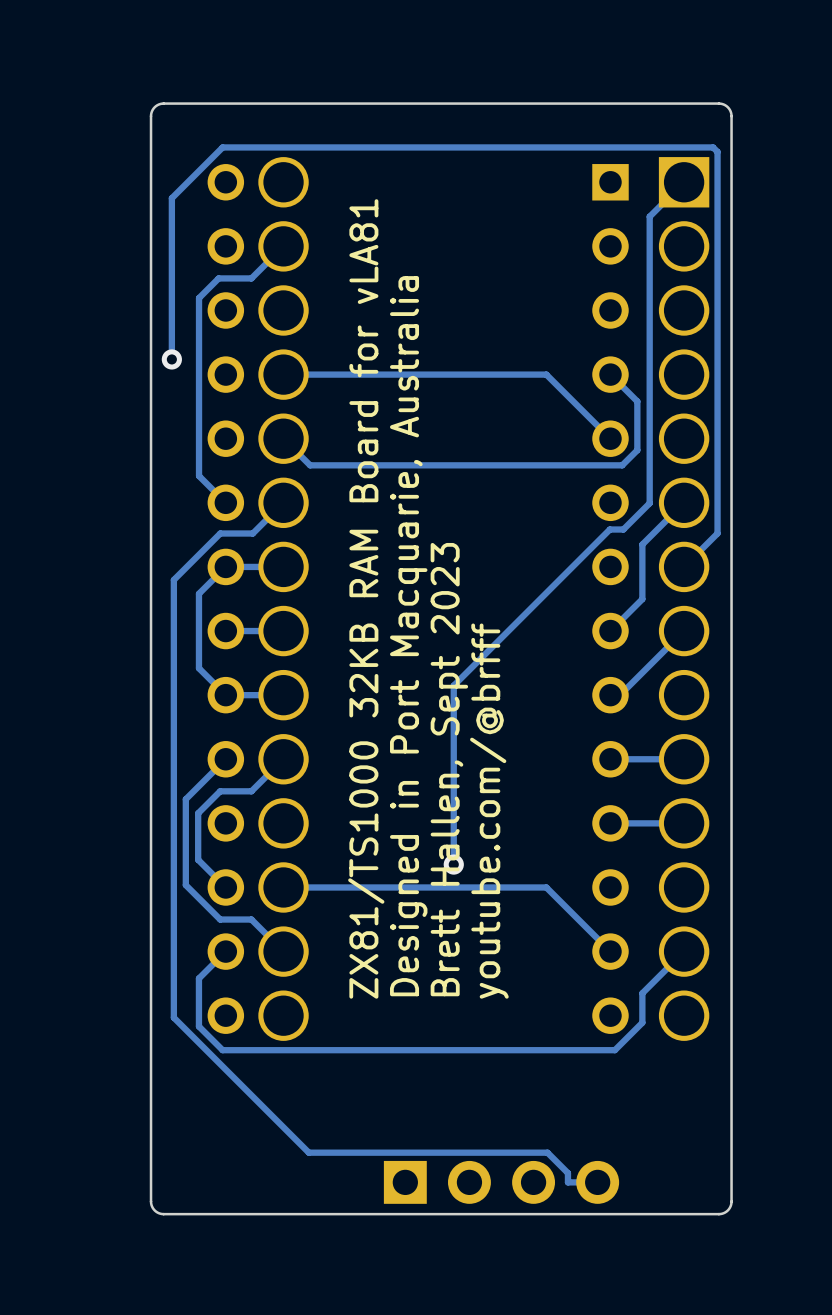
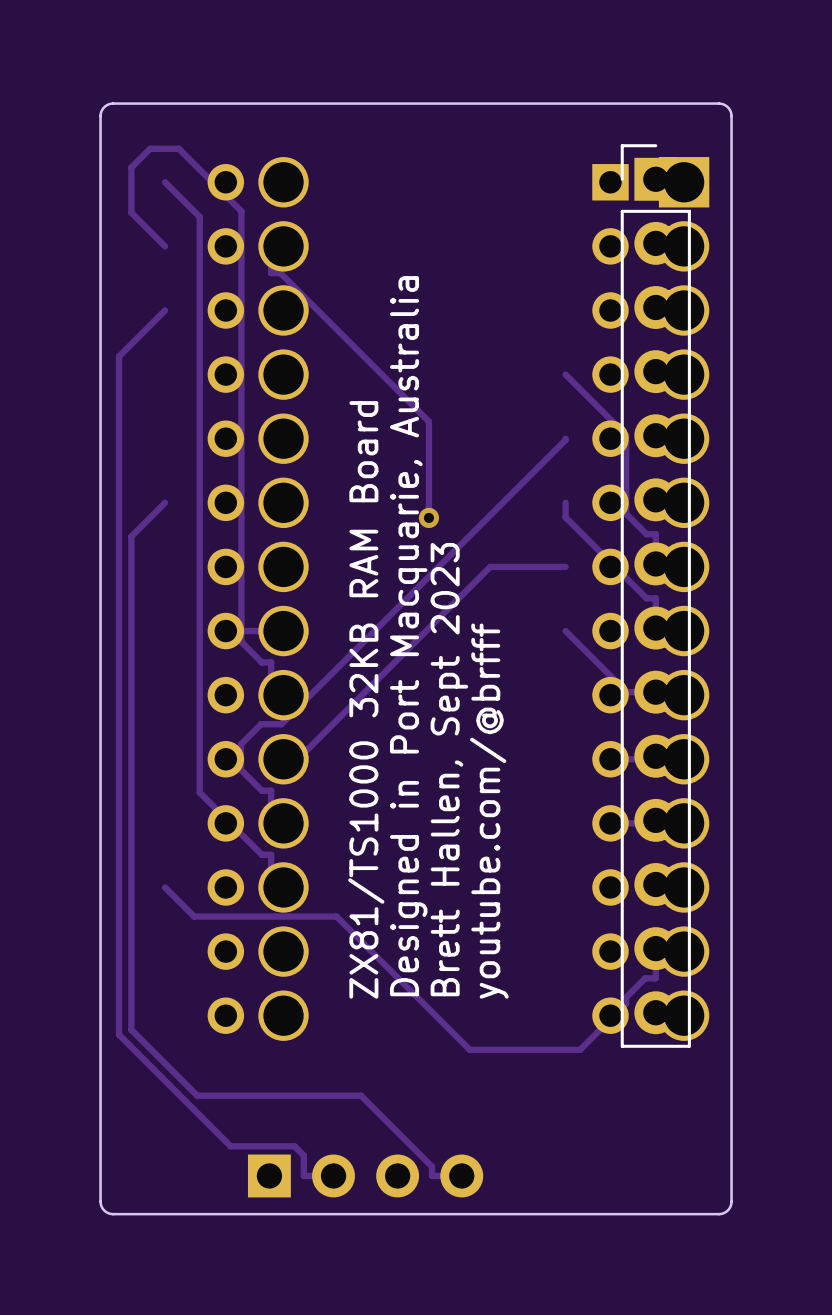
board edge: (163, 103) (154, 107) (151, 116) (151, 1201) (154, 1210) (163, 1214) -> (163, 103) (109, 104) (103, 108) (100, 116) (100, 1201) (103, 1209) (109, 1213) (163, 1214)
track: none -> (165, 182) (199, 216) (199, 792) (261, 854) (271, 854) (271, 884)
track: (684, 182) (649, 216) (649, 503) (623, 529) (609, 529) (453, 685) (453, 864) -> none
track: none -> (271, 243) (271, 273) (280, 273) (428, 421) (428, 517)
track: none -> (165, 246) (131, 212) (131, 167) (150, 148) (178, 148) (241, 211) (241, 642) (261, 662) (271, 662) (271, 692)
track: (283, 246) (251, 278) (218, 278) (199, 298) (199, 476) (225, 502) -> none
track: none -> (165, 310) (119, 356) (119, 1034) (230, 1146) (294, 1146) (303, 1155) (303, 1175) (333, 1175)
track: (171, 359) (171, 198) (222, 147) (713, 147) (717, 151) (717, 533) (684, 566) -> none
via: (171, 359) -> none
track: (283, 374) (546, 374) (610, 438) -> none
track: none -> (565, 374) (626, 435) (626, 513) (646, 534) (655, 534) (655, 563)
track: (610, 374) (637, 401) (637, 450) (622, 465) (310, 465) (283, 438) -> none
track: none -> (565, 438) (281, 724) (261, 724) (240, 744) (240, 769) (261, 790) (271, 790) (271, 820)
track: none -> (165, 502) (131, 536) (131, 1029) (197, 1095) (361, 1095) (432, 1166) (432, 1175) (461, 1175)
track: (283, 502) (252, 533) (220, 533) (173, 579) (173, 1017) (308, 1152) (547, 1152) (567, 1173) (567, 1182) (597, 1182) -> none
track: none -> (565, 502) (565, 517) (646, 598) (655, 598) (655, 628)
track: (684, 502) (642, 544) (642, 599) (610, 631) -> none
via: none -> (428, 517)
track: (283, 566) (225, 566) (198, 593) (198, 668) (225, 695) (283, 695) -> none
track: none -> (565, 566) (490, 566) (300, 756) (271, 756)
part: none -> (655, 596)
text: ZX81/TS1000 32KB RAM Board for vLA81 (366, 598) -> ZX81/TS1000 32KB RAM Board (366, 699)
track: none -> (565, 631) (626, 692) (655, 692)
track: (684, 631) (619, 695) (610, 695) -> none
track: (225, 759) (185, 799) (185, 885) (220, 919) (251, 919) (283, 951) -> none
track: (283, 759) (251, 791) (220, 791) (198, 813) (198, 859) (225, 887) -> none
via: (453, 864) -> none
track: none -> (165, 887) (194, 916) (336, 916) (469, 1049) (580, 1049) (626, 1003) (626, 997) (645, 978) (655, 978) (655, 948)
track: (283, 887) (546, 887) (610, 951) -> none
track: (684, 951) (642, 993) (642, 1022) (614, 1050) (222, 1050) (198, 1026) (198, 978) (225, 951) -> none
part position: (501, 1182) -> (365, 1175)

